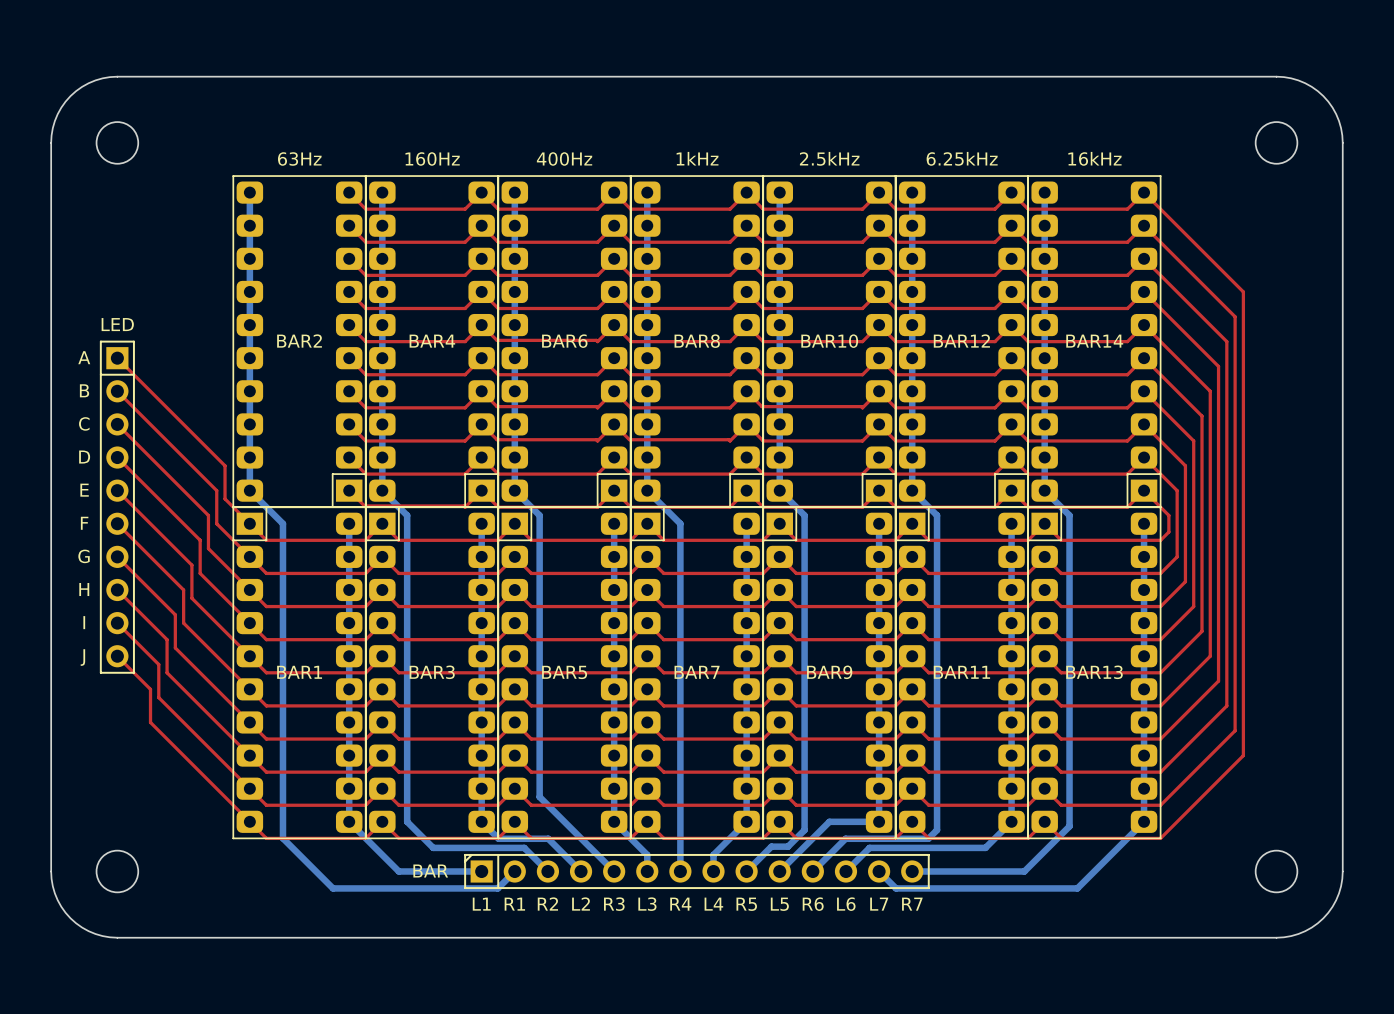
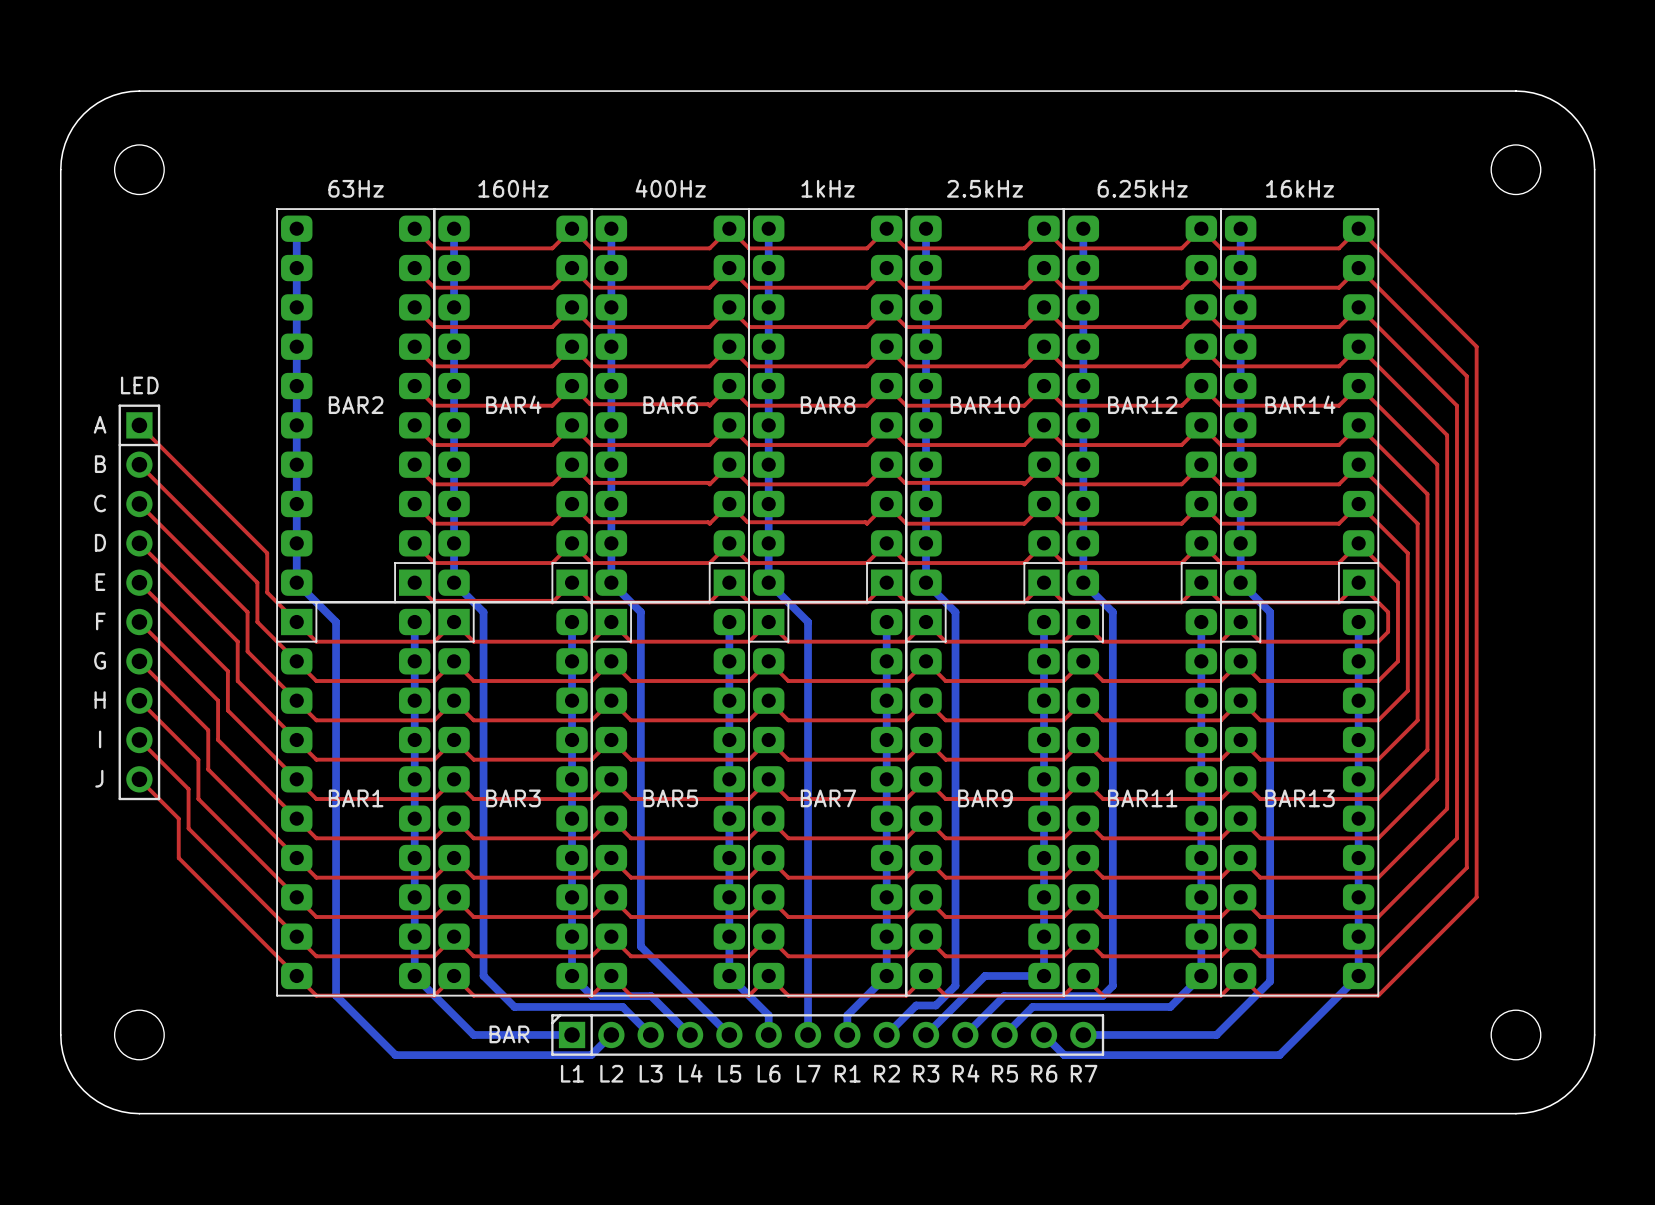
text: R1 (514, 904) -> L2 (611, 1073)
text: R2 (547, 904) -> L3 (651, 1073)
text: L2 (581, 904) -> L4 (690, 1073)
text: R3 (614, 904) -> L5 (729, 1073)
text: L3 (647, 904) -> L6 (769, 1073)
text: R4 (680, 904) -> L7 (808, 1073)
text: L4 (713, 904) -> R1 (847, 1073)
text: R5 (746, 904) -> R2 (887, 1073)
text: L5 (779, 904) -> R3 (926, 1073)
text: R6 (813, 904) -> R4 (966, 1073)
text: L6 (846, 904) -> R5 (1005, 1073)
text: L7 (879, 904) -> R6 (1044, 1073)

